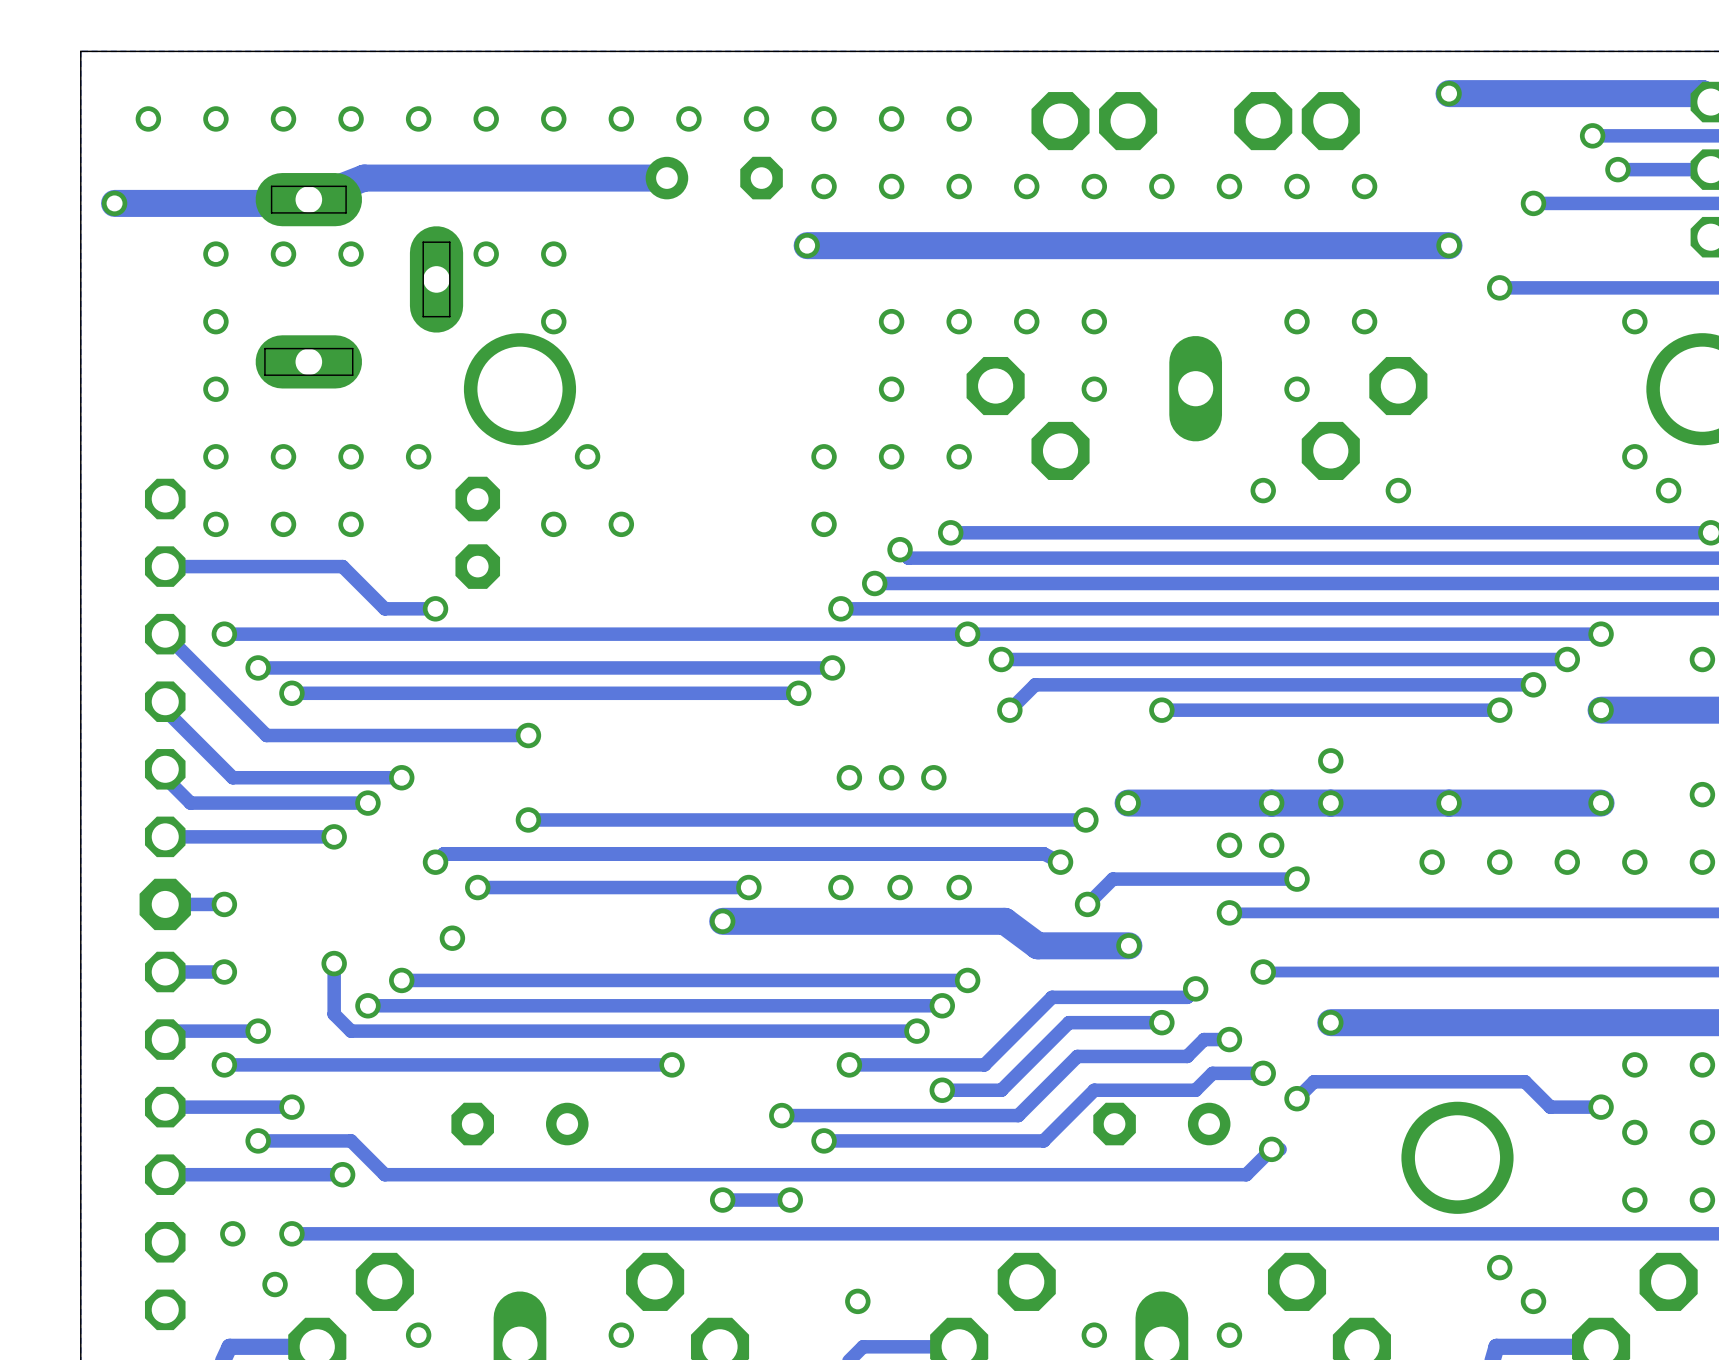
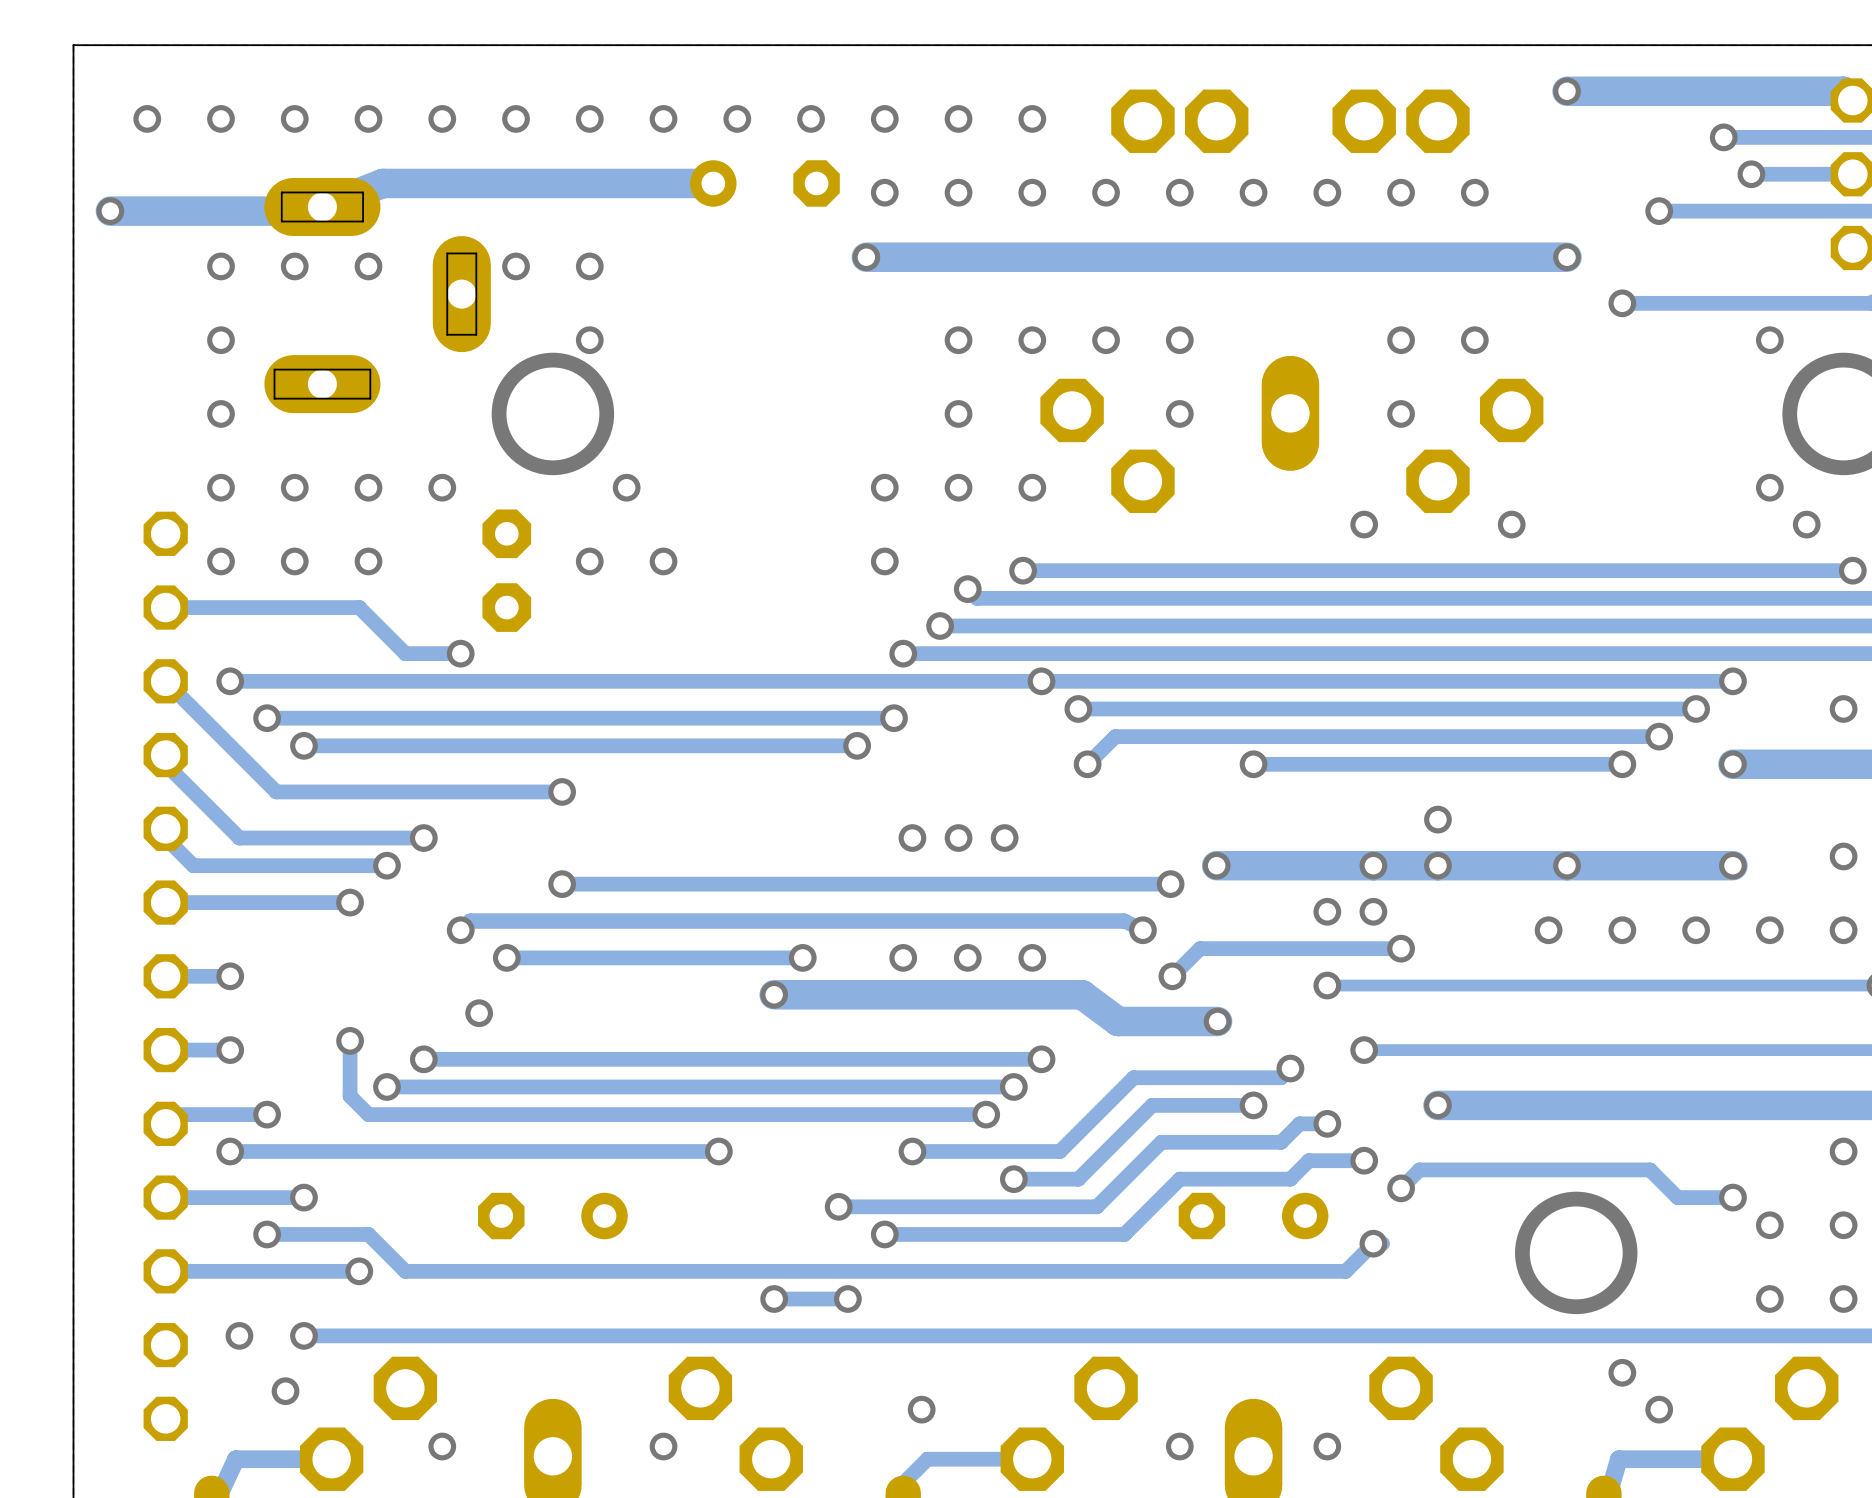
part footprint: [139, 878, 191, 931] -> [143, 954, 188, 999]
via: (1634, 1064) -> none

